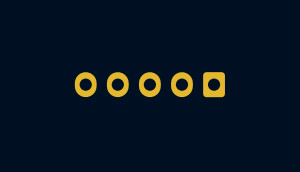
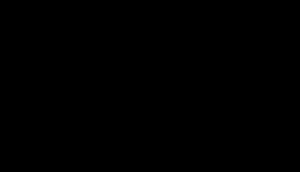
part: (149, 84) -> none

